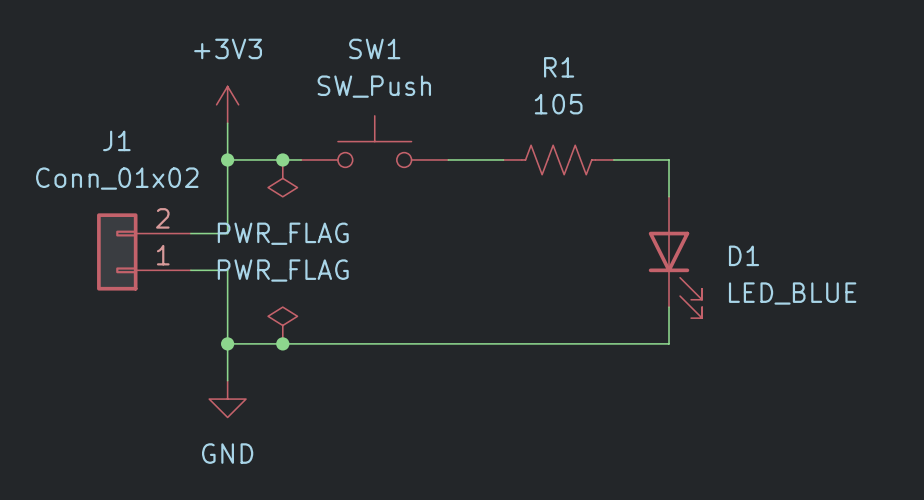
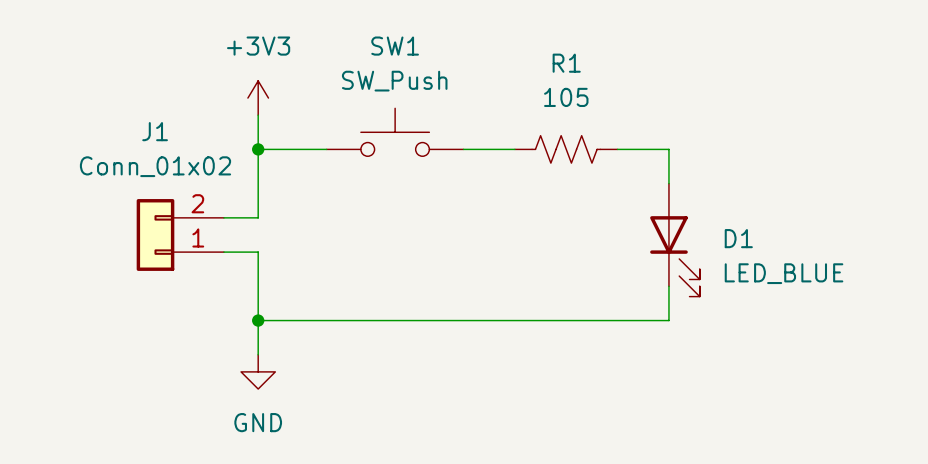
junction: (282, 159) -> none
power symbol: PWR_FLAG (282, 178) -> none
power symbol: PWR_FLAG (282, 325) -> none
junction: (282, 343) -> none

